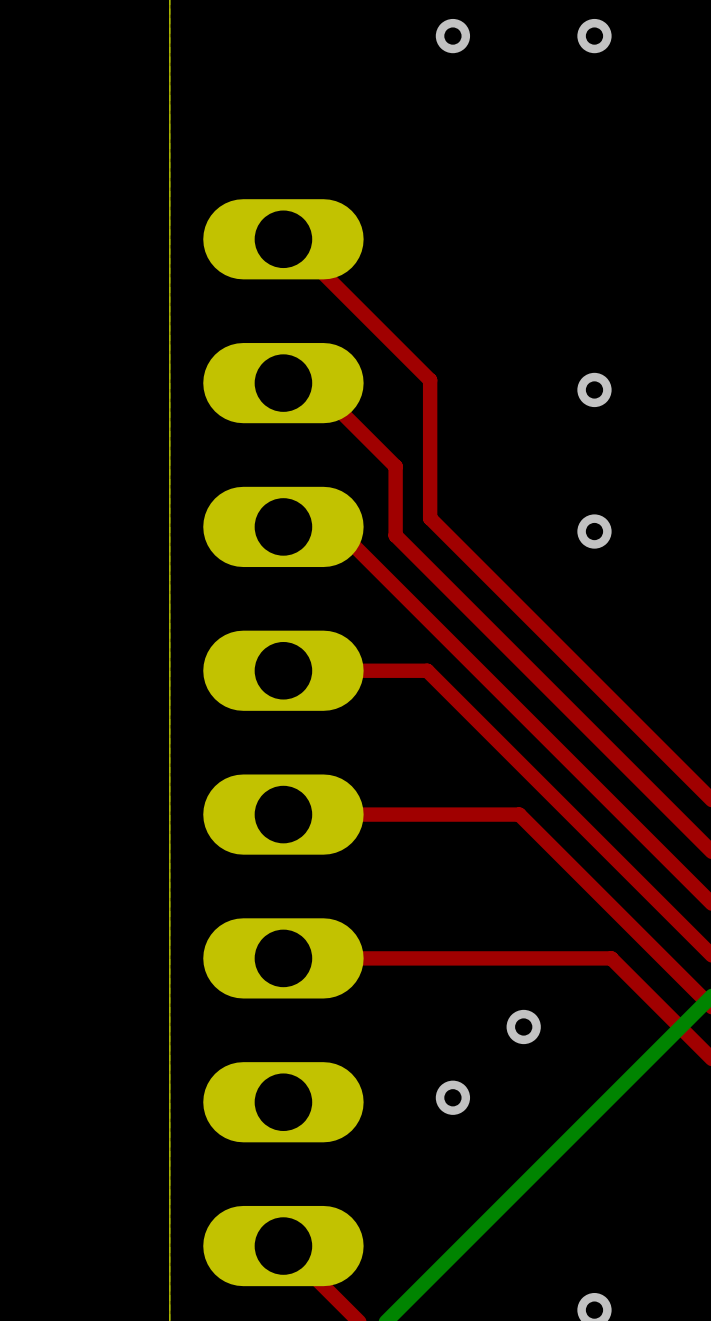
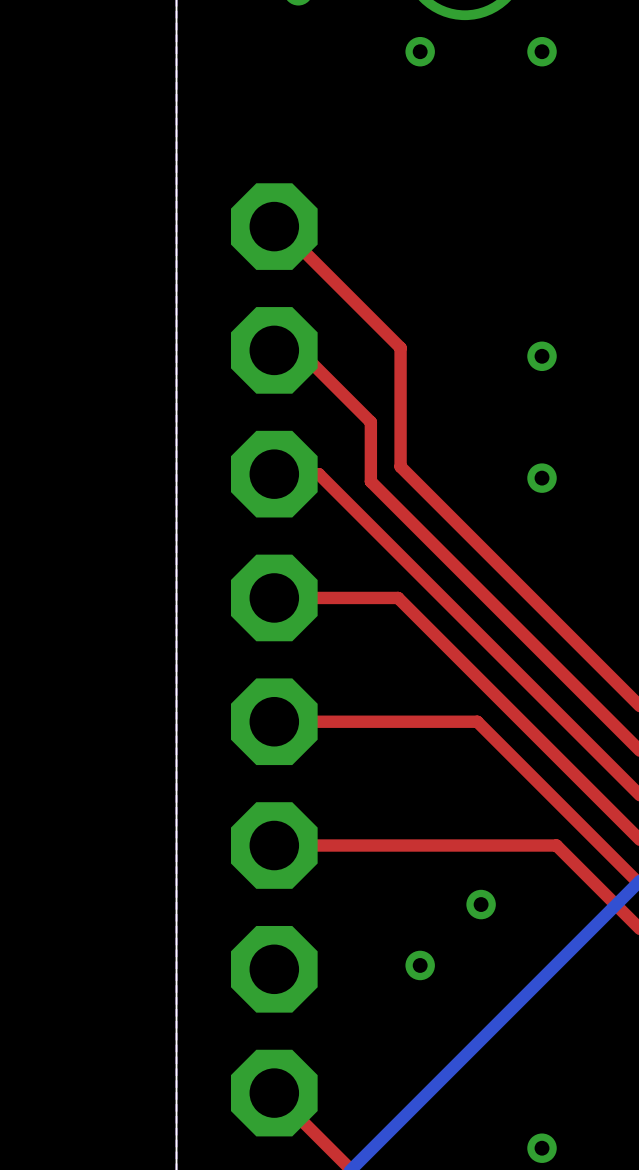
part footprint: [203, 199, 364, 1287] -> [230, 183, 318, 1137]

